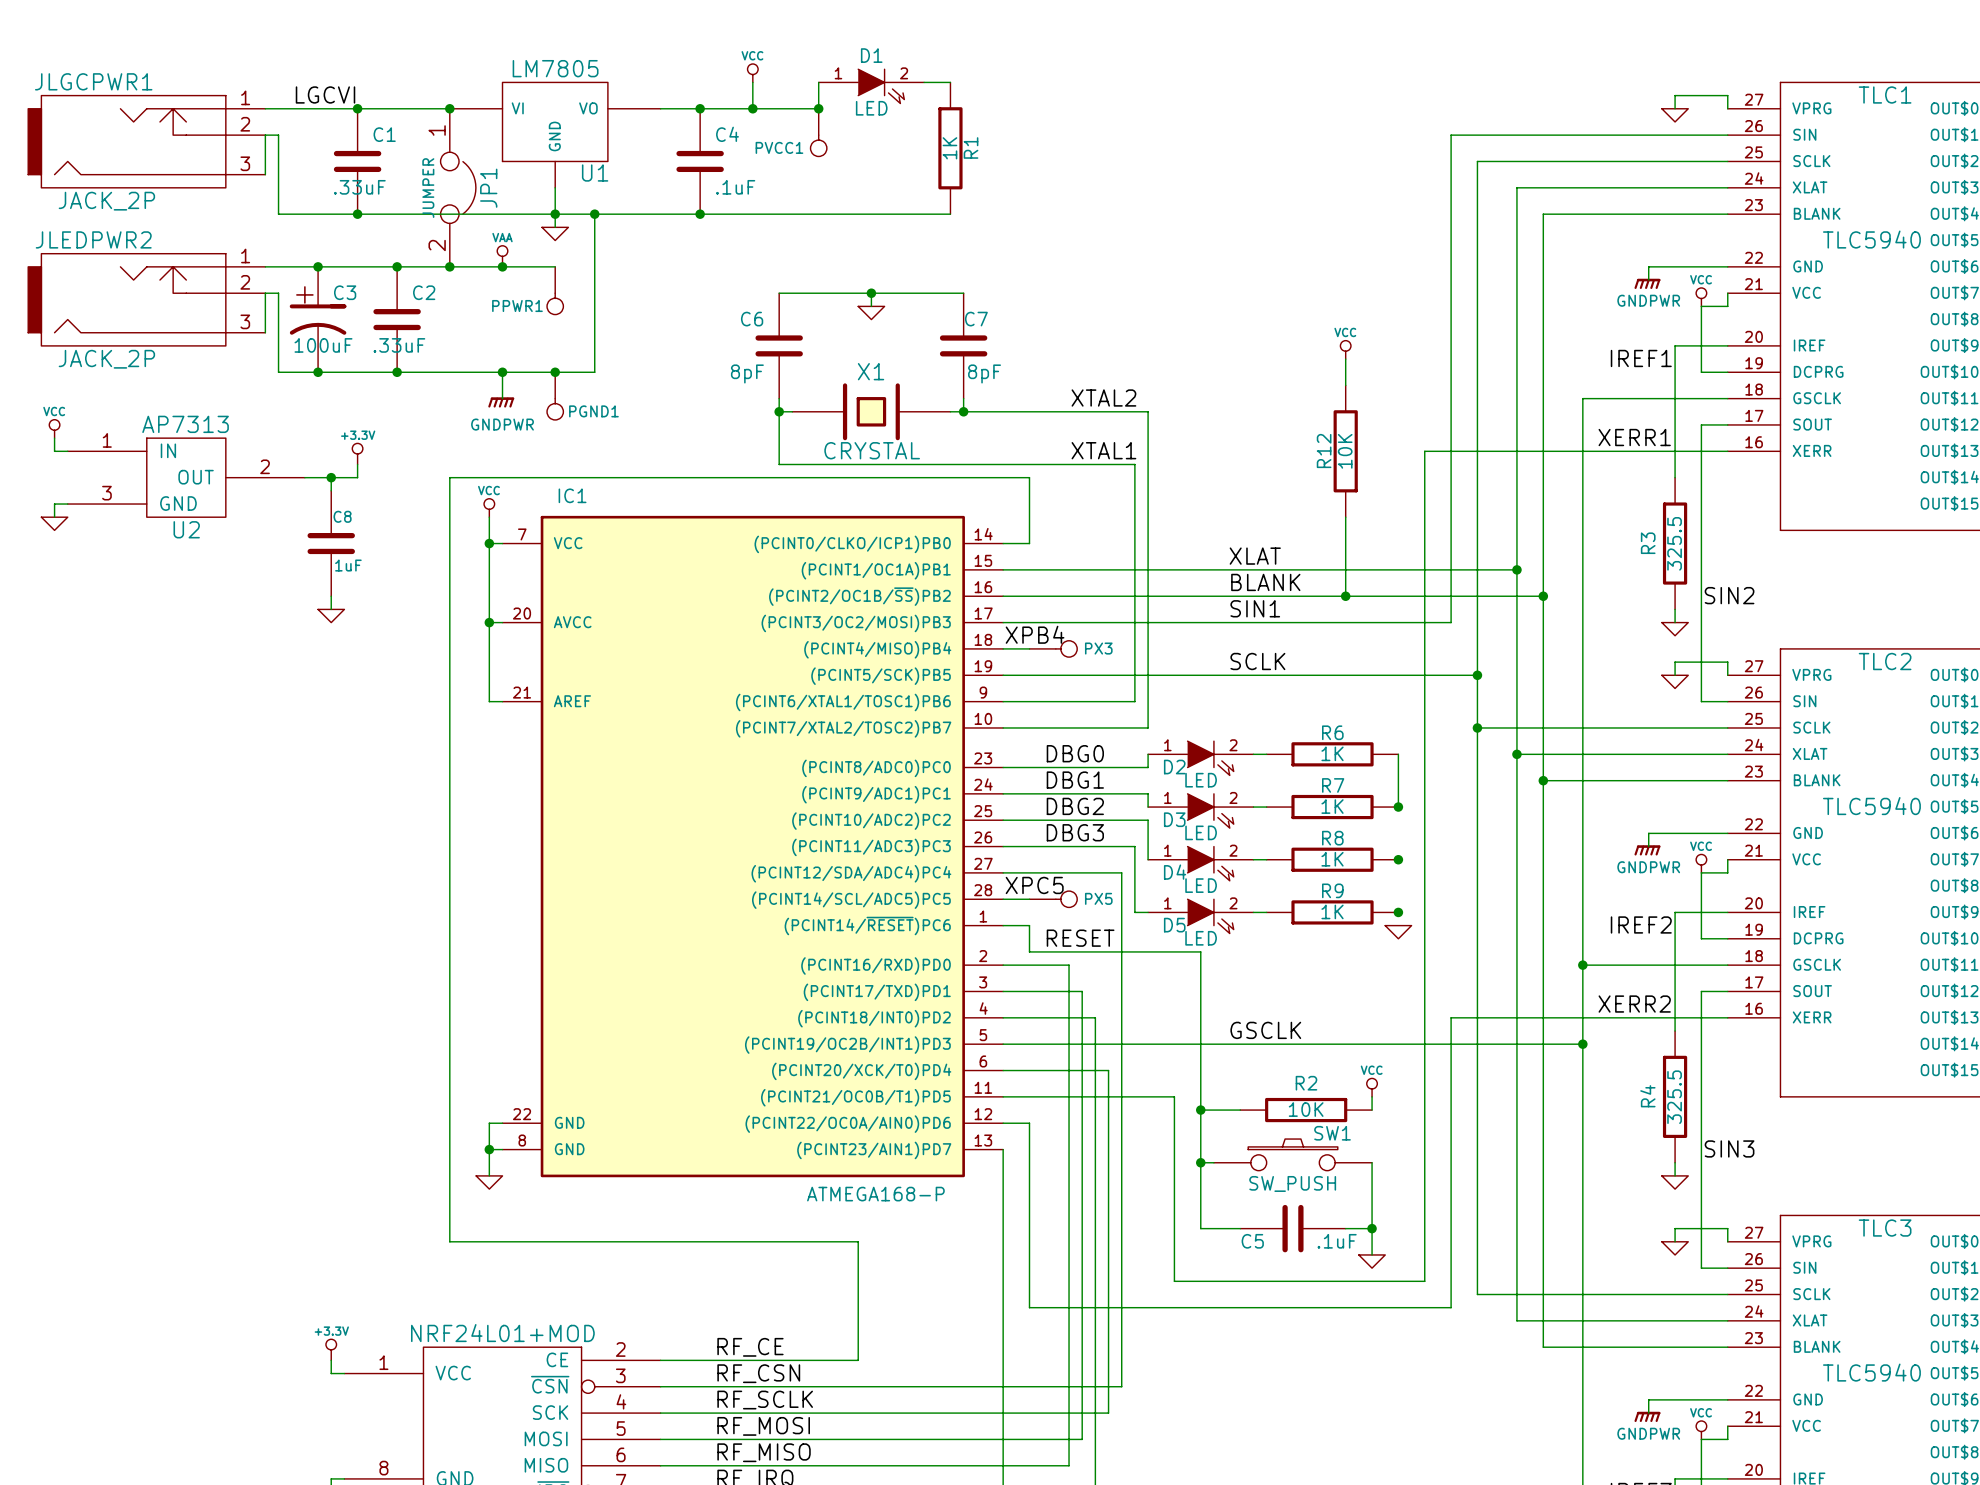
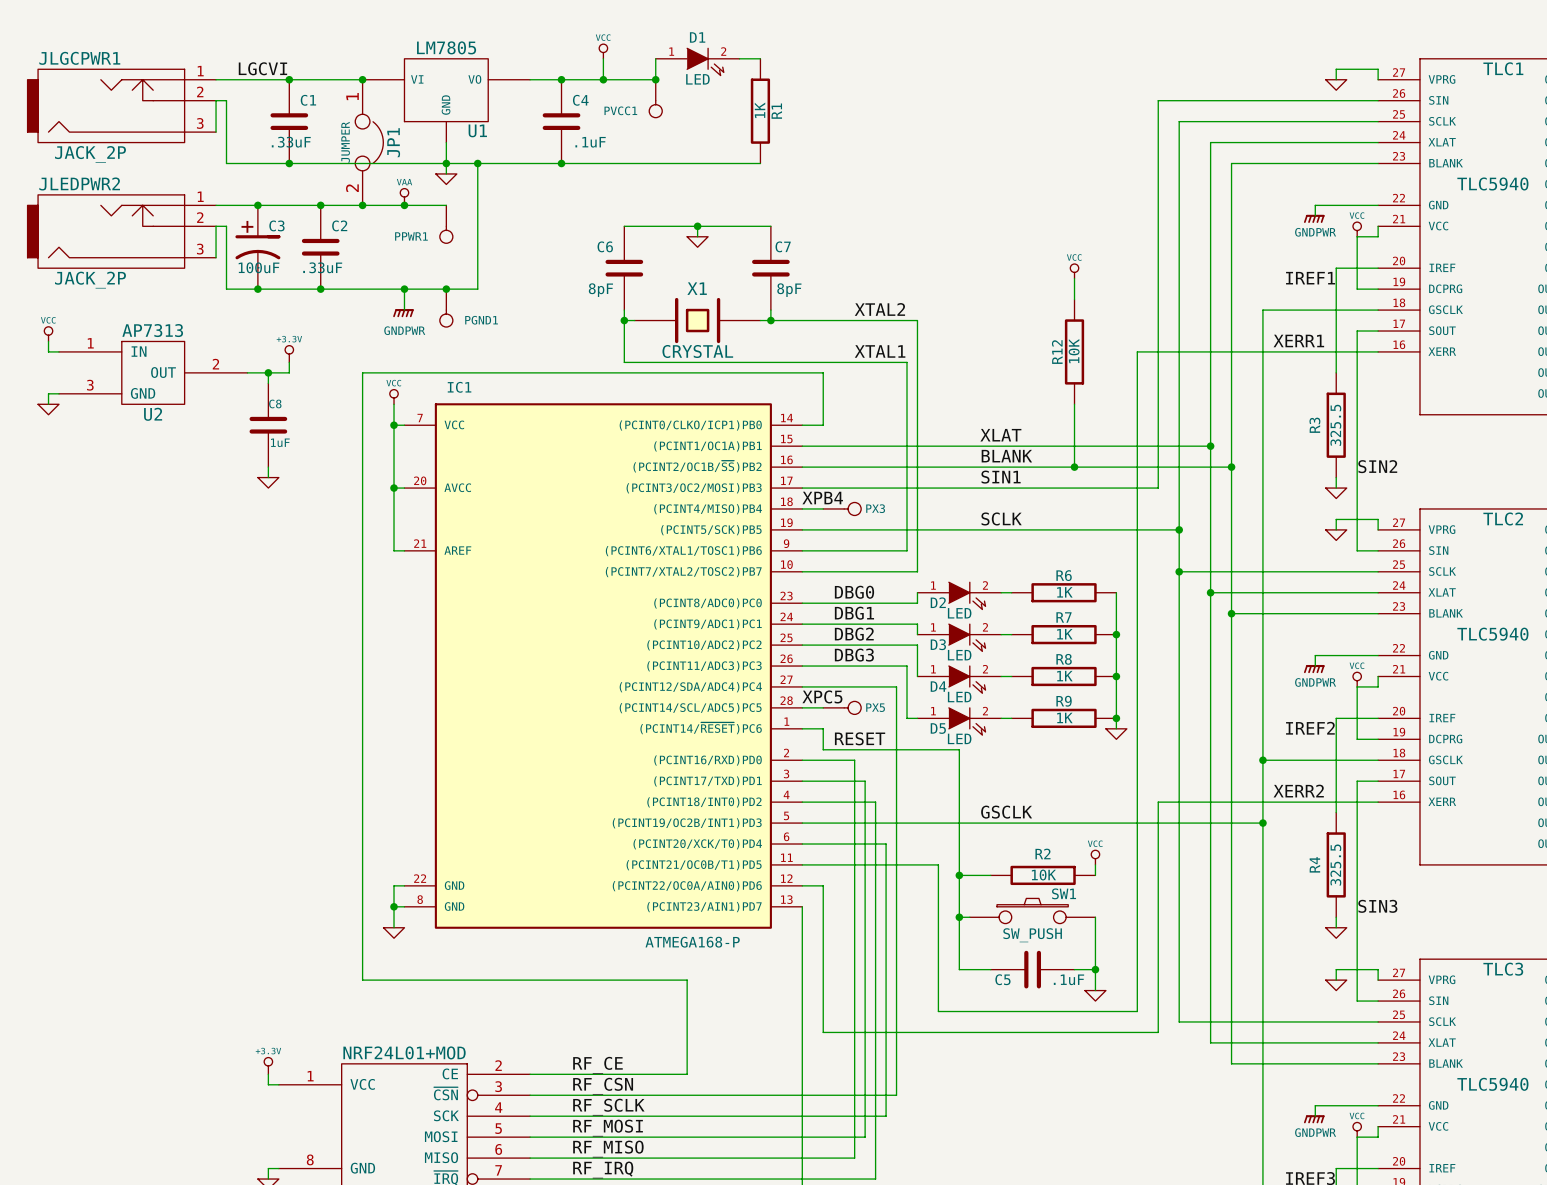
wire: none -> (1116, 634) (1116, 728)

